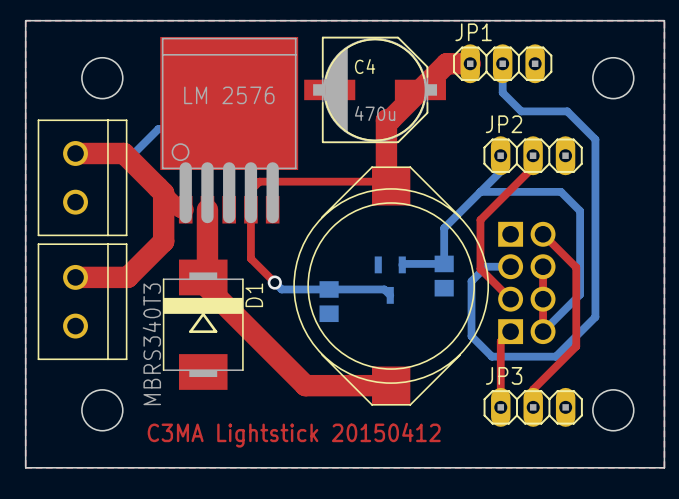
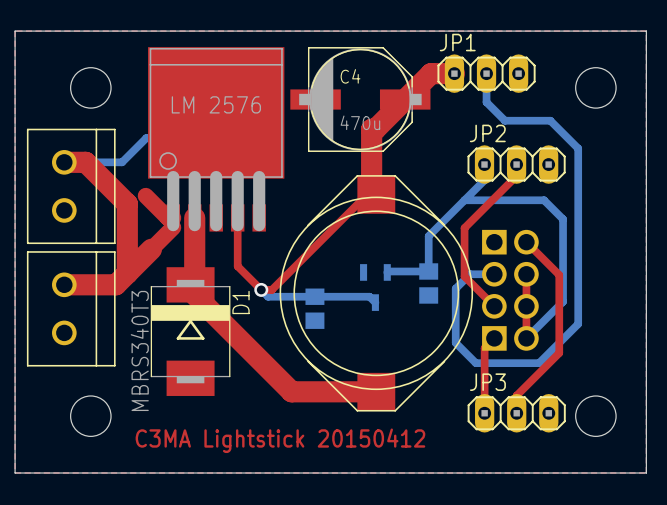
top track: (97, 153) (124, 153) (163, 193) (163, 241) -> (85, 162) (127, 203) (127, 273) (124, 276)
top track: (386, 181) (259, 181) (250, 190) (250, 209) -> (371, 190) (271, 289) (261, 289)
top track: none -> (173, 227) (151, 249)

